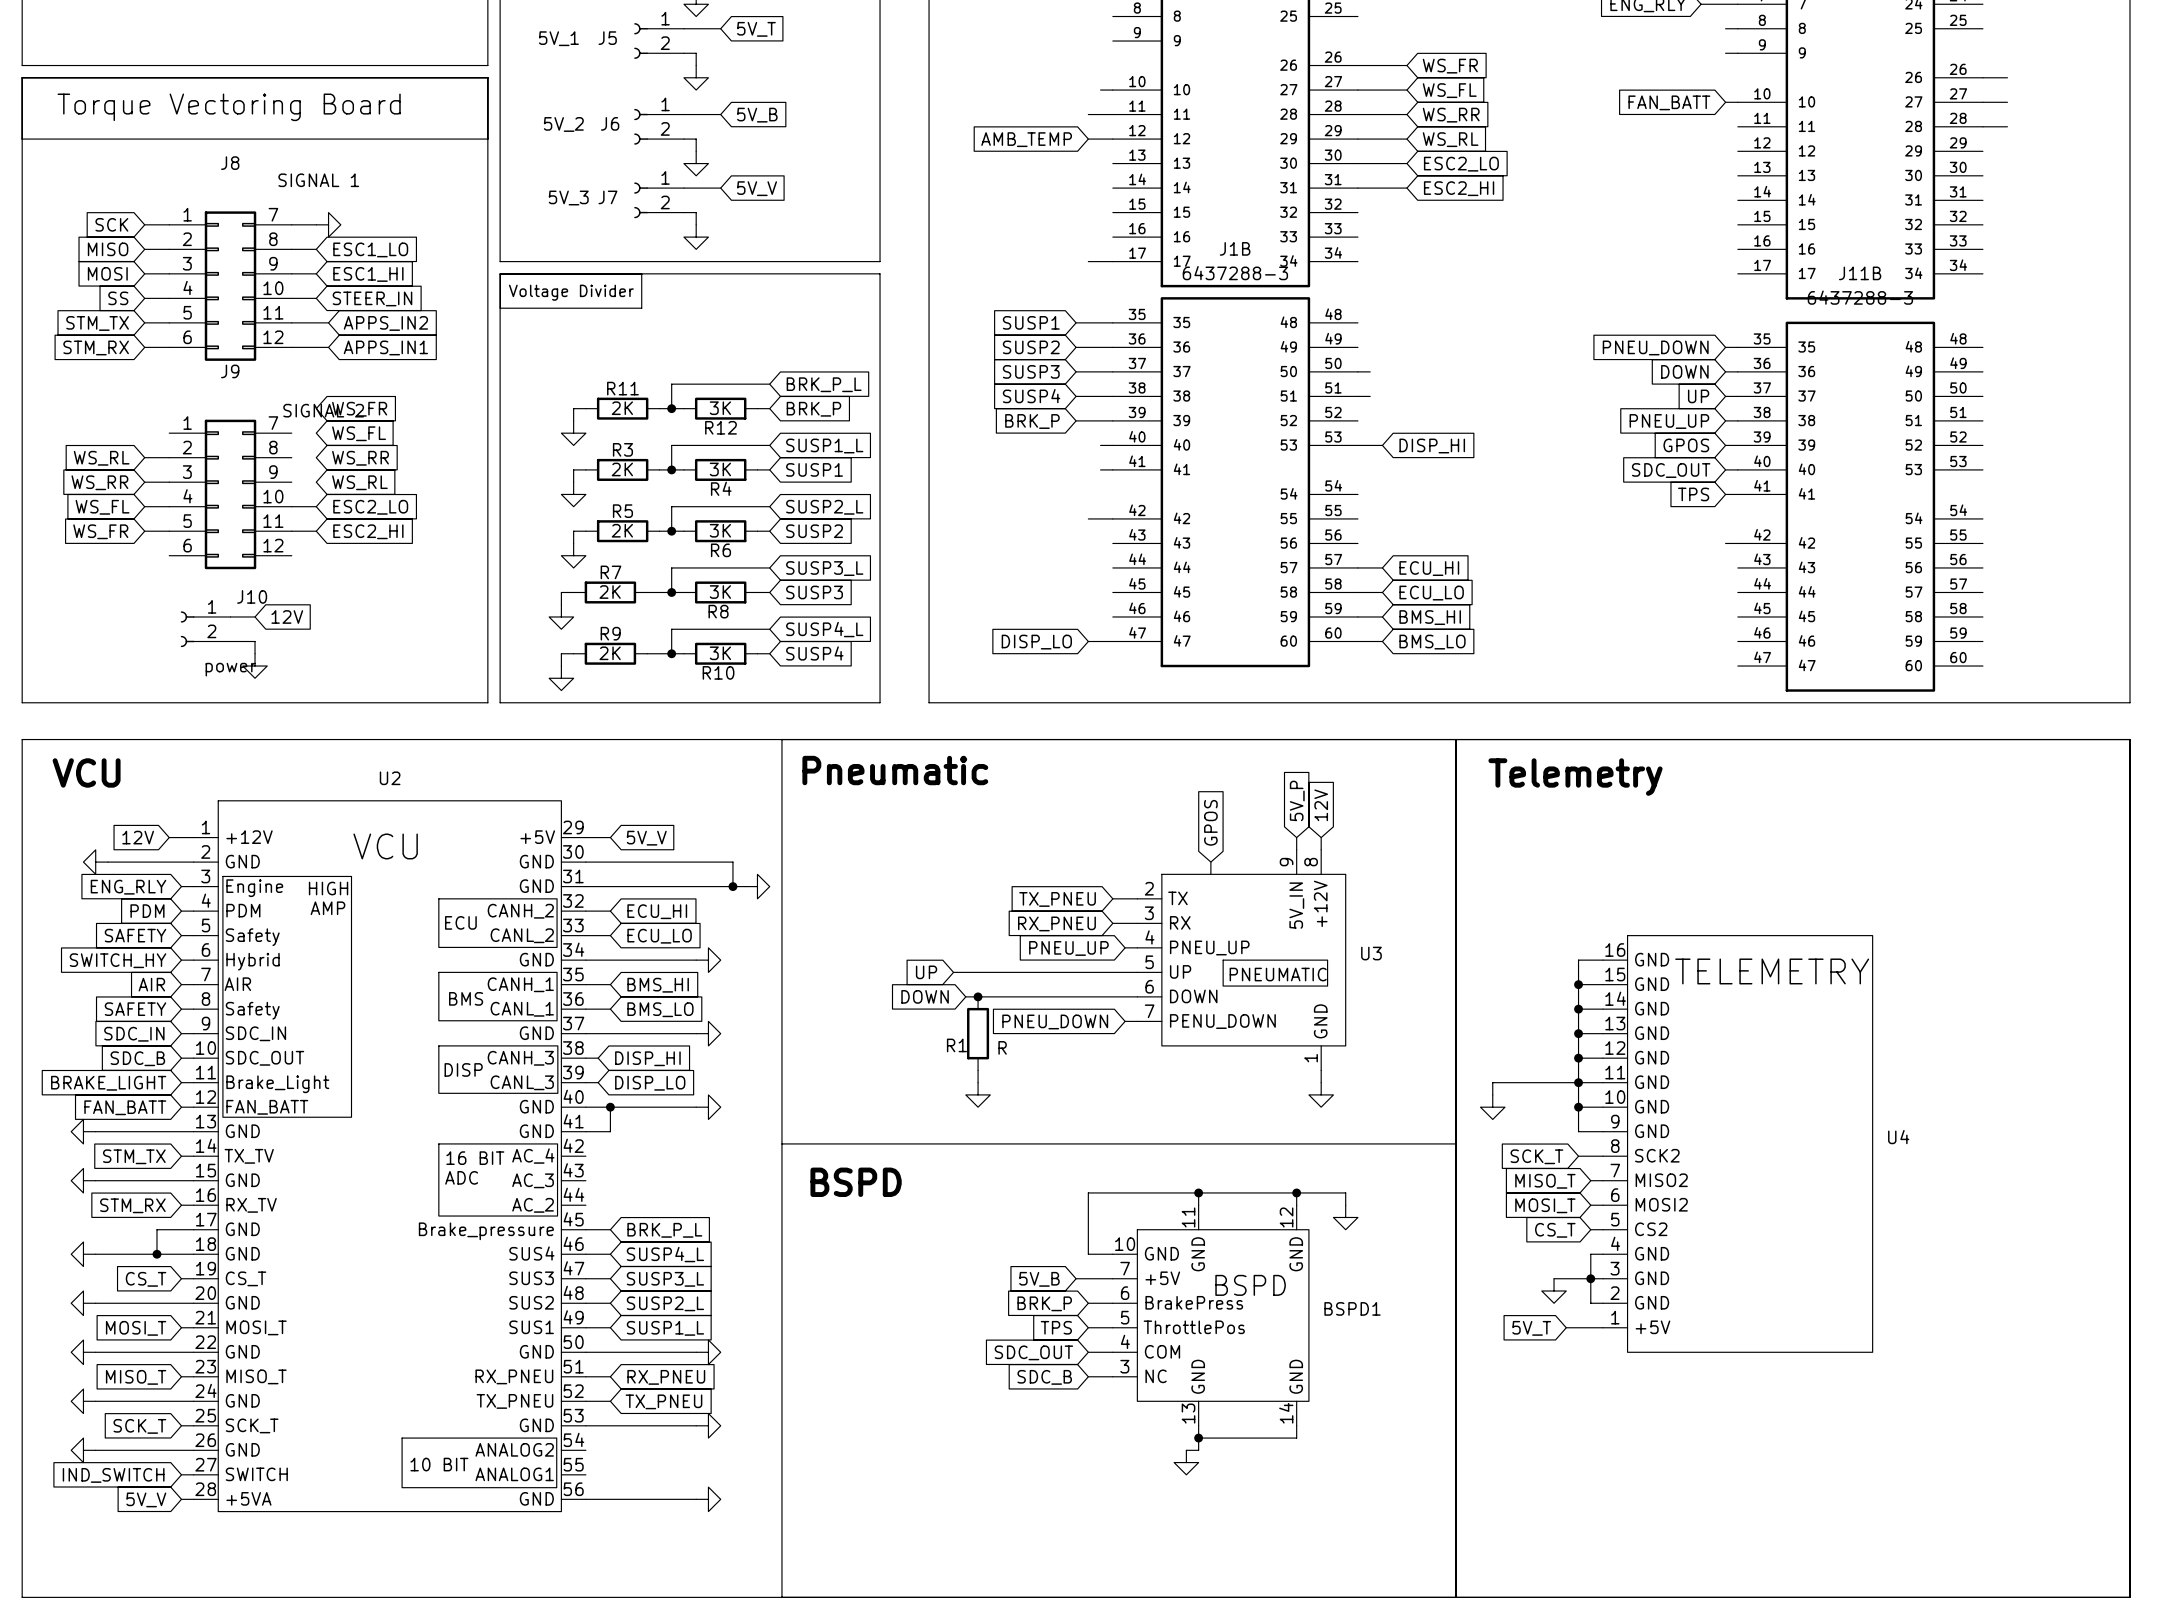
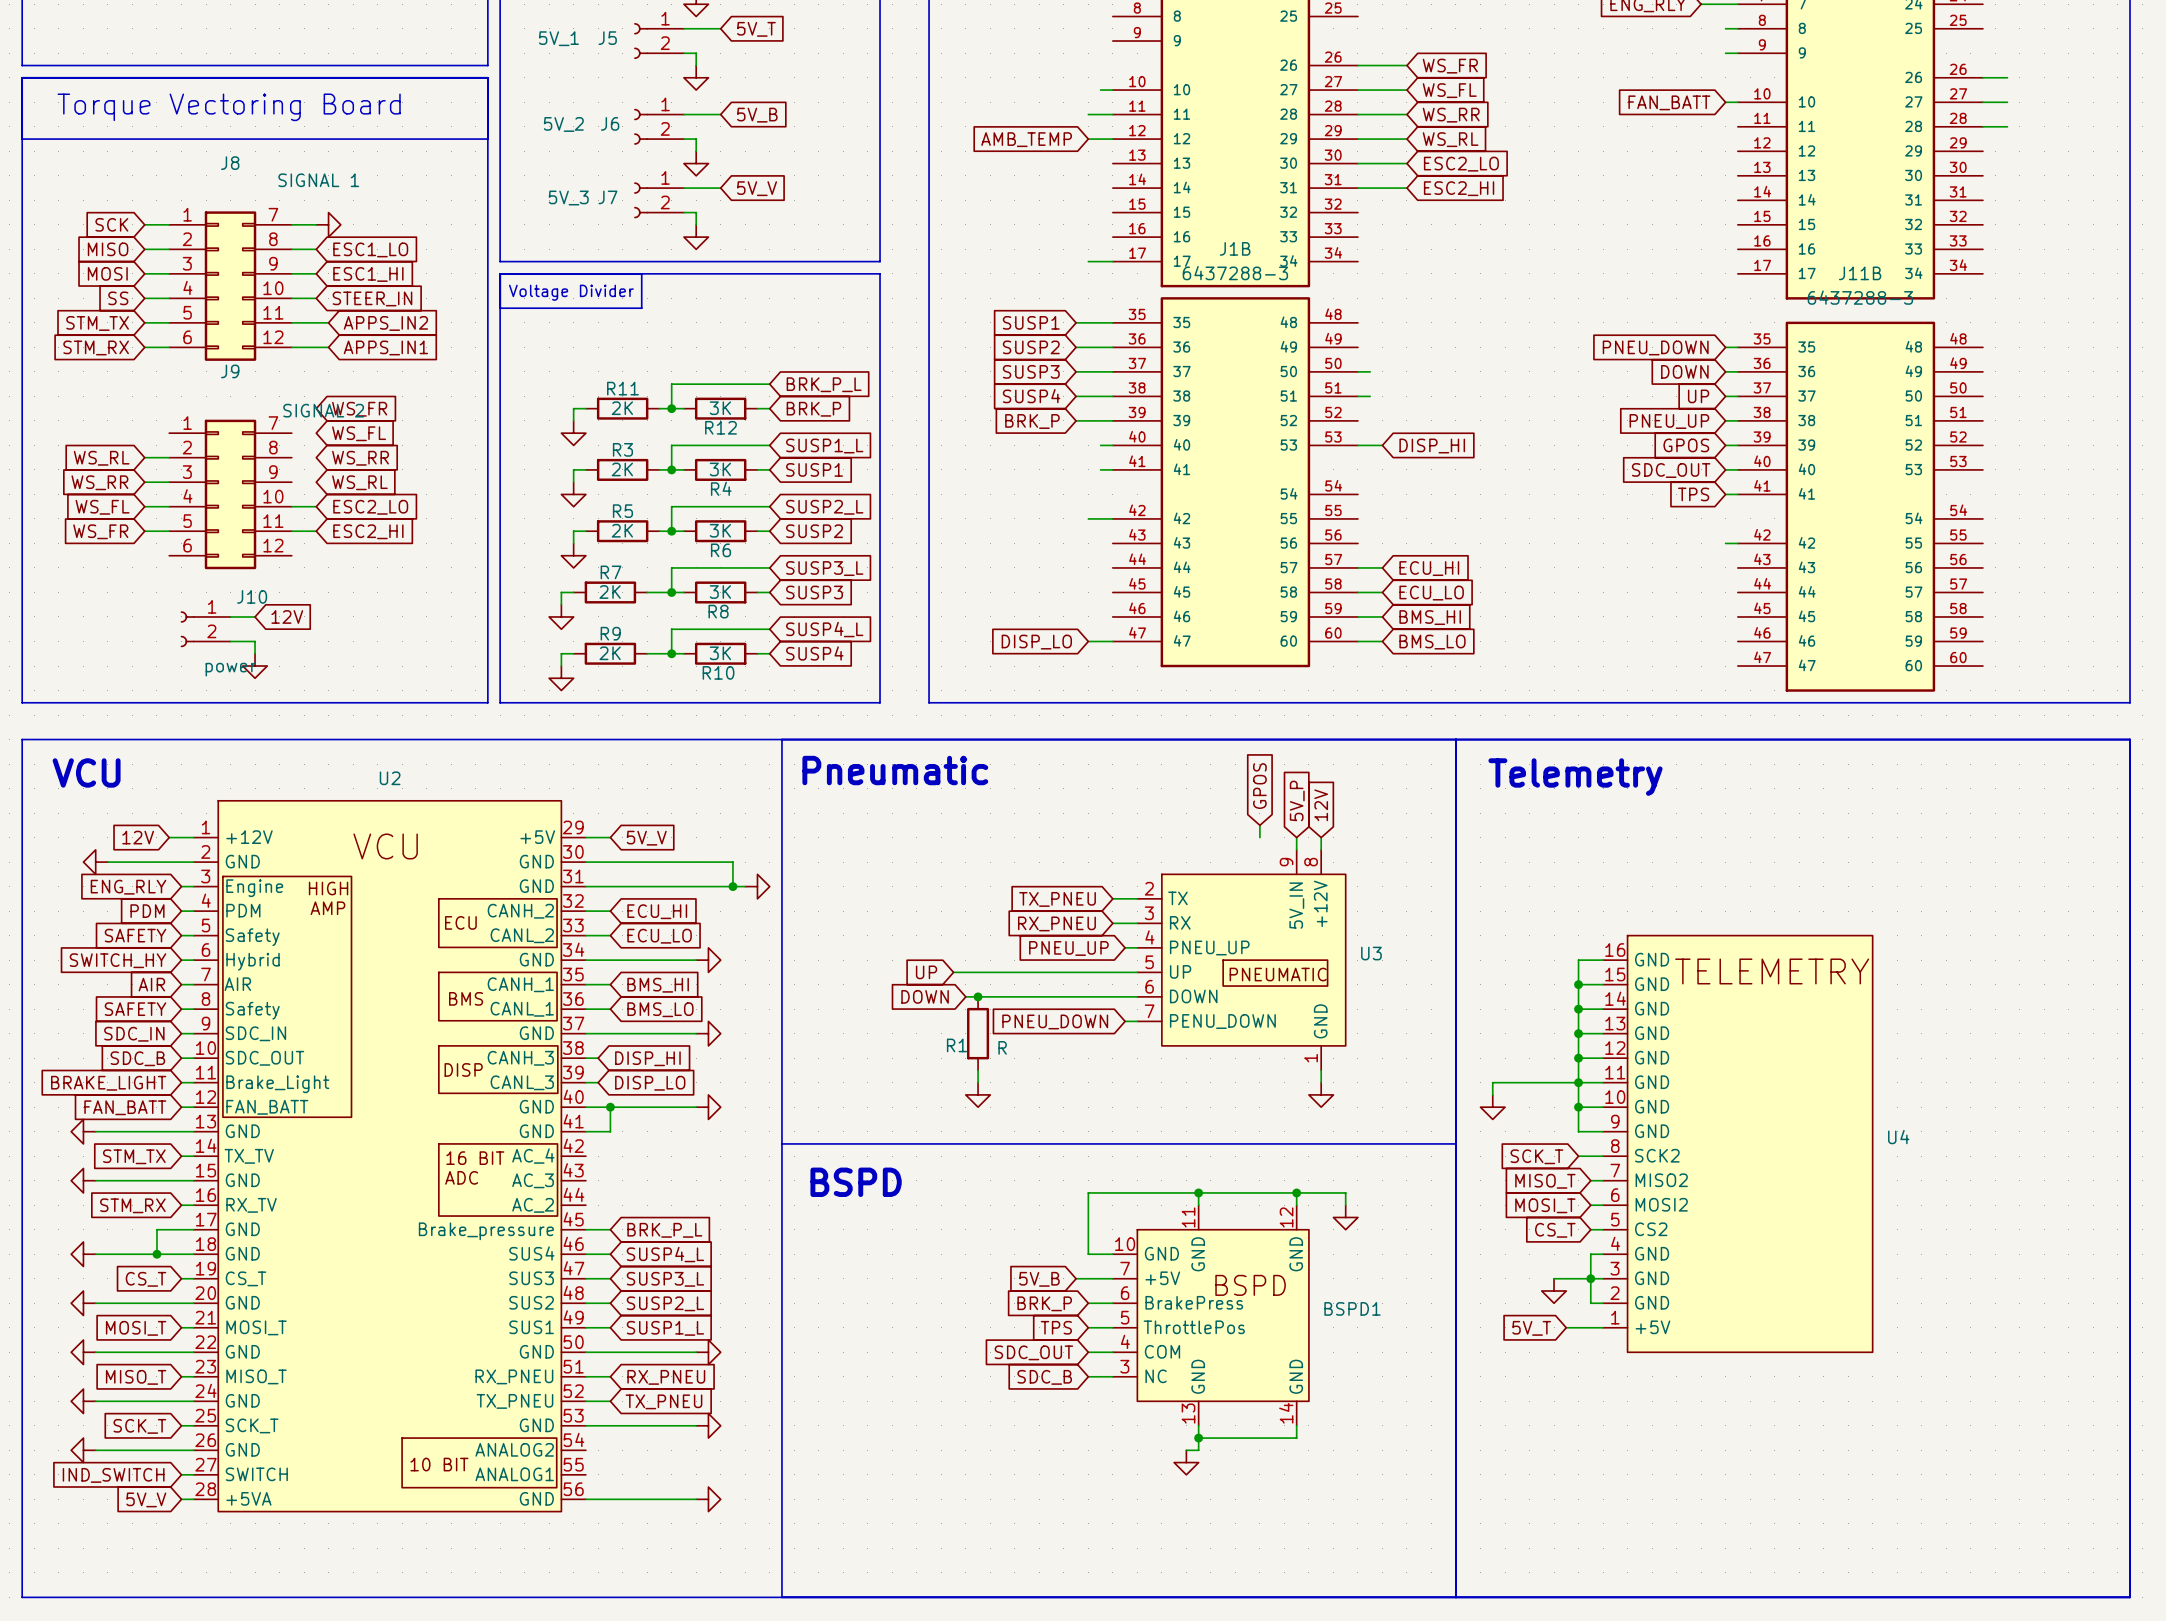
global label position: GPOS (1210, 822) -> GPOS (1259, 786)
wire: (1210, 862) (1210, 874) -> (1259, 825) (1259, 837)

